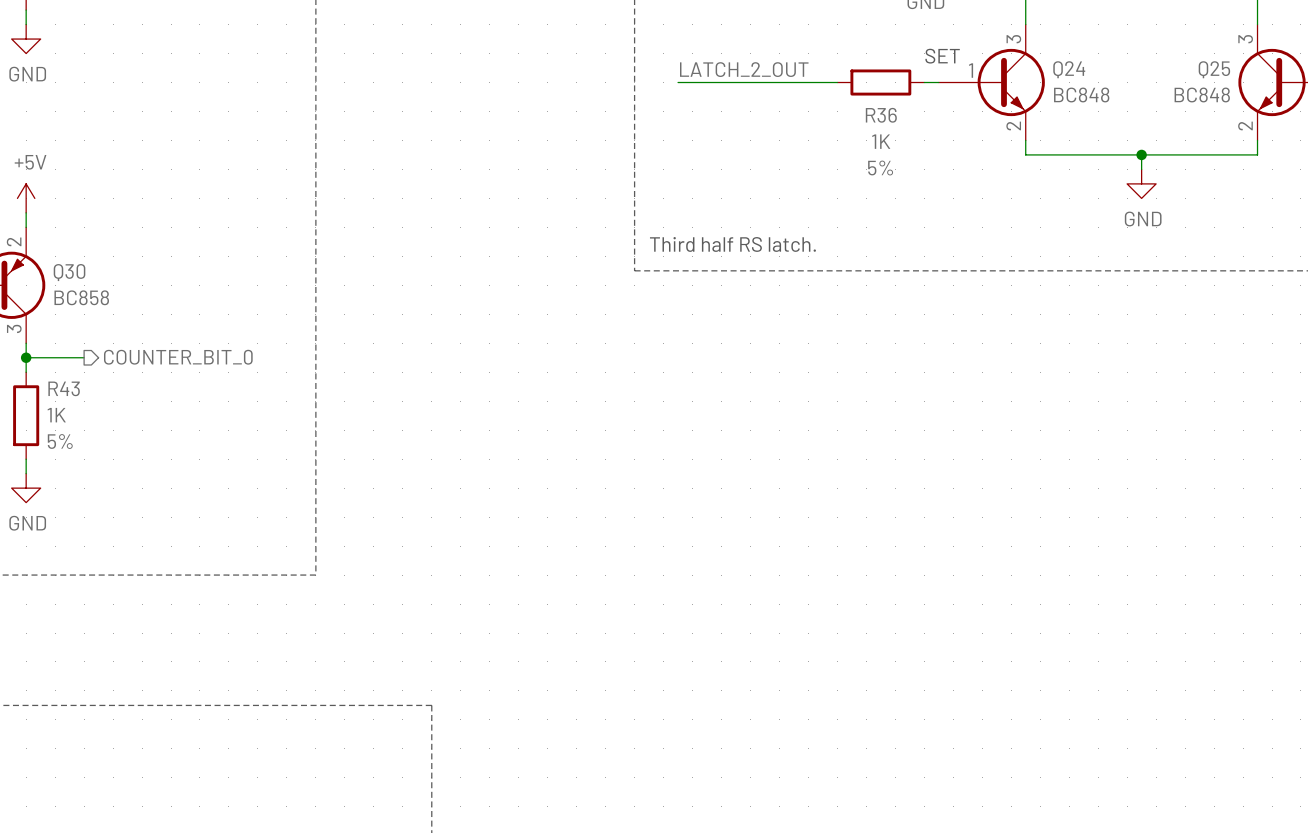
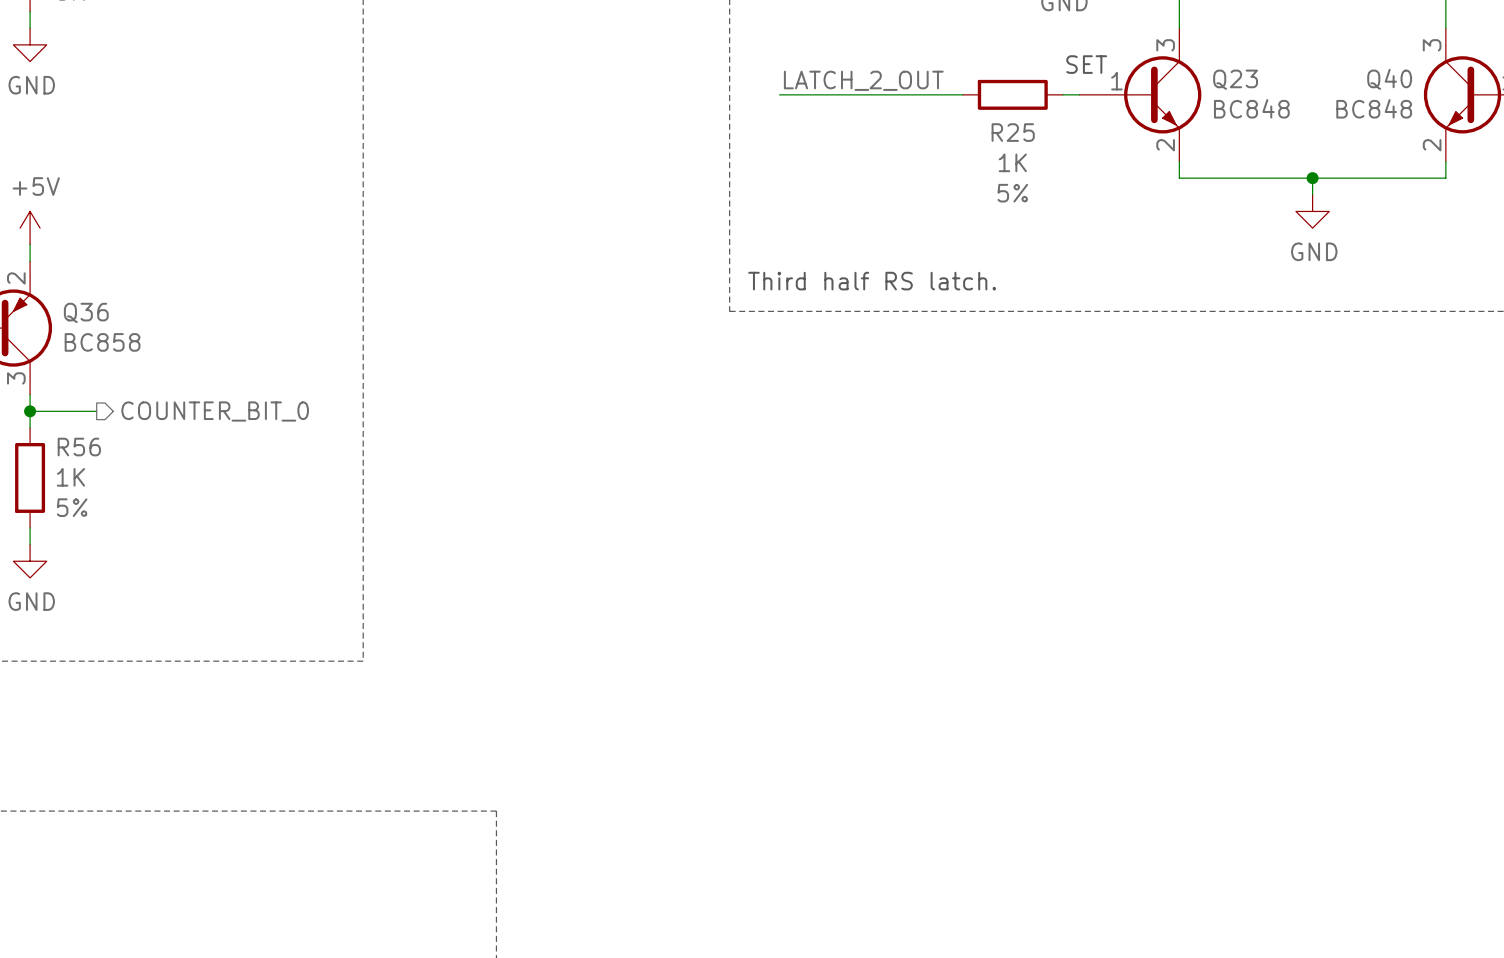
Q24 name: Q24 (1069, 69) -> Q23 (1235, 79)
Q25 name: Q25 (1214, 69) -> Q40 (1389, 79)
R36 name: R36 (881, 115) -> R25 (1013, 132)
Q30 name: Q30 (69, 272) -> Q36 (86, 312)
R43 name: R43 (64, 388) -> R56 (79, 447)

